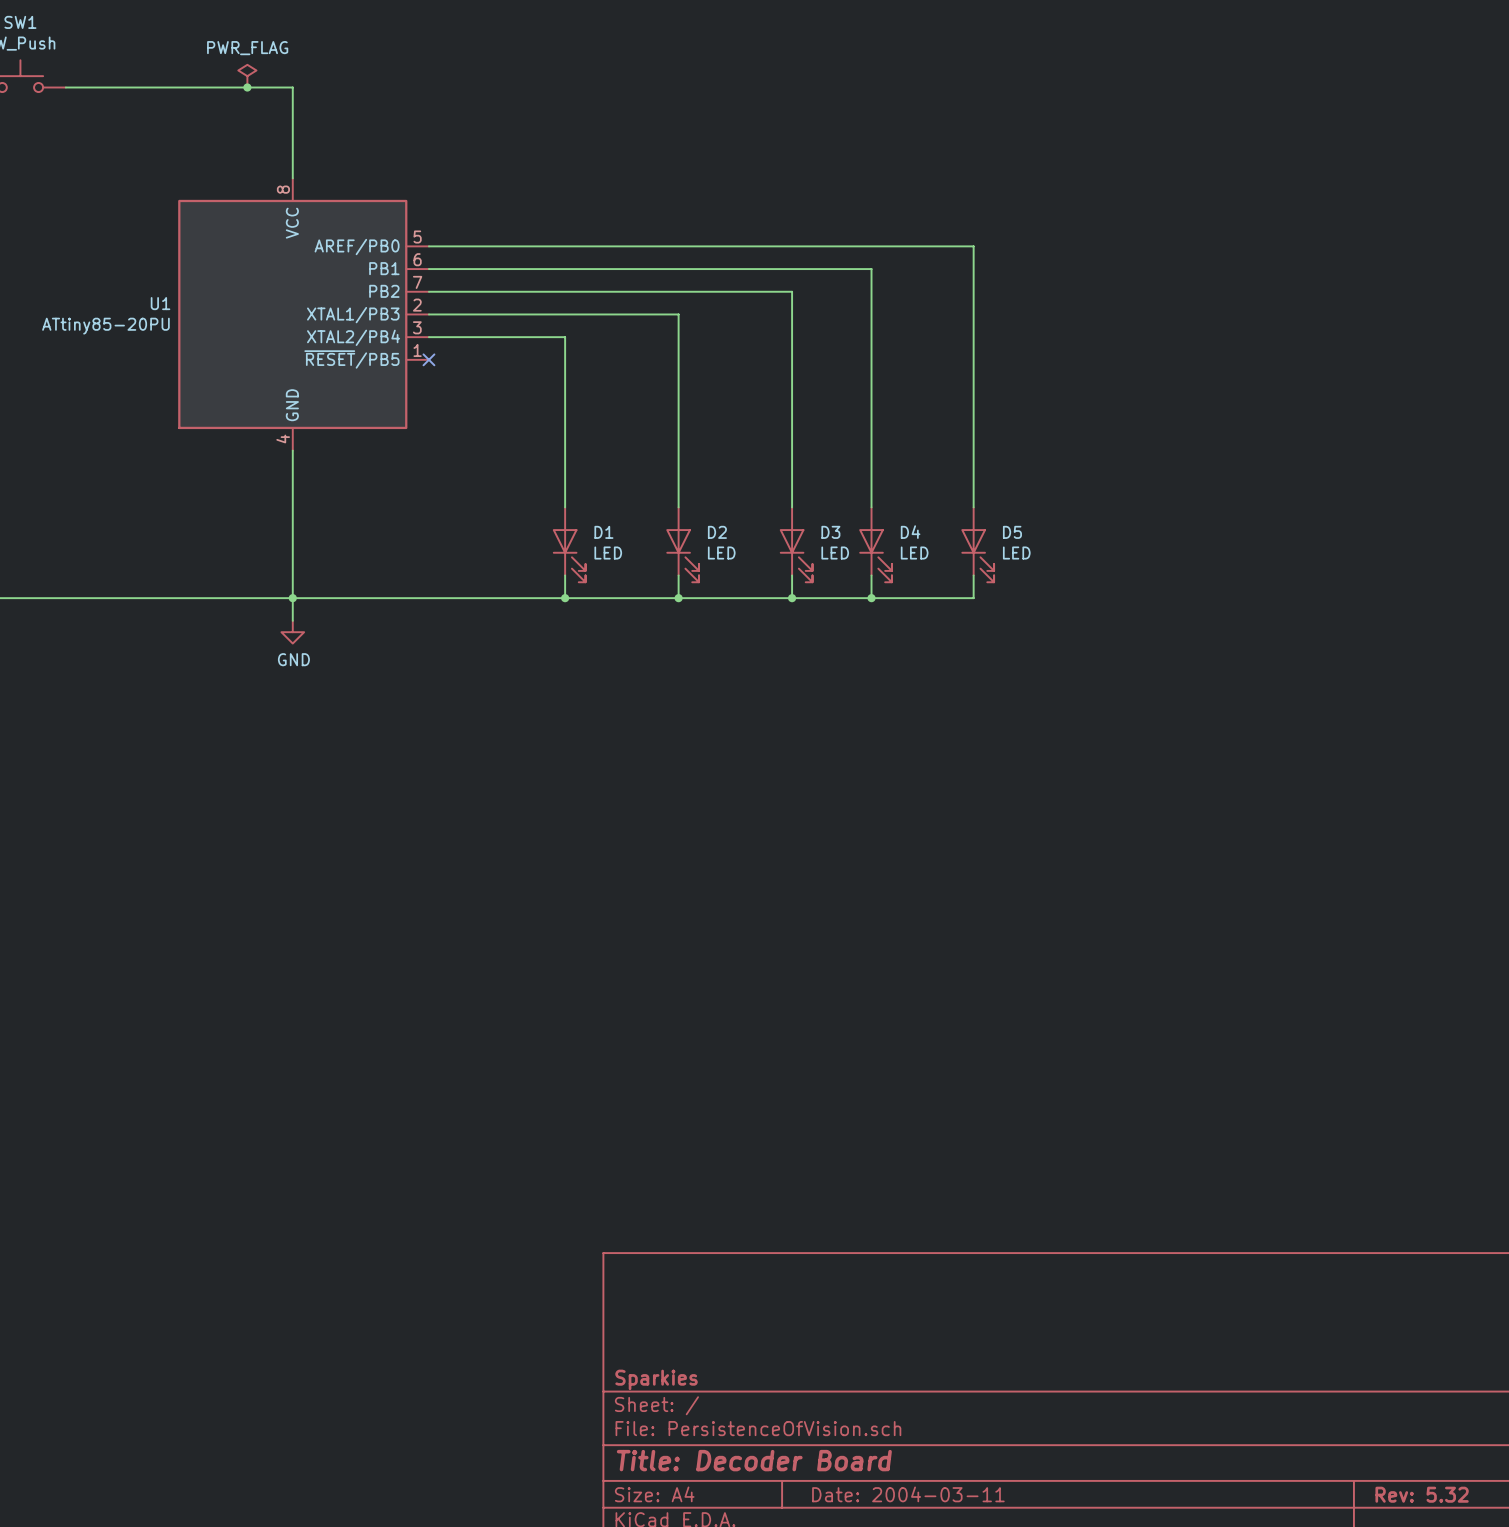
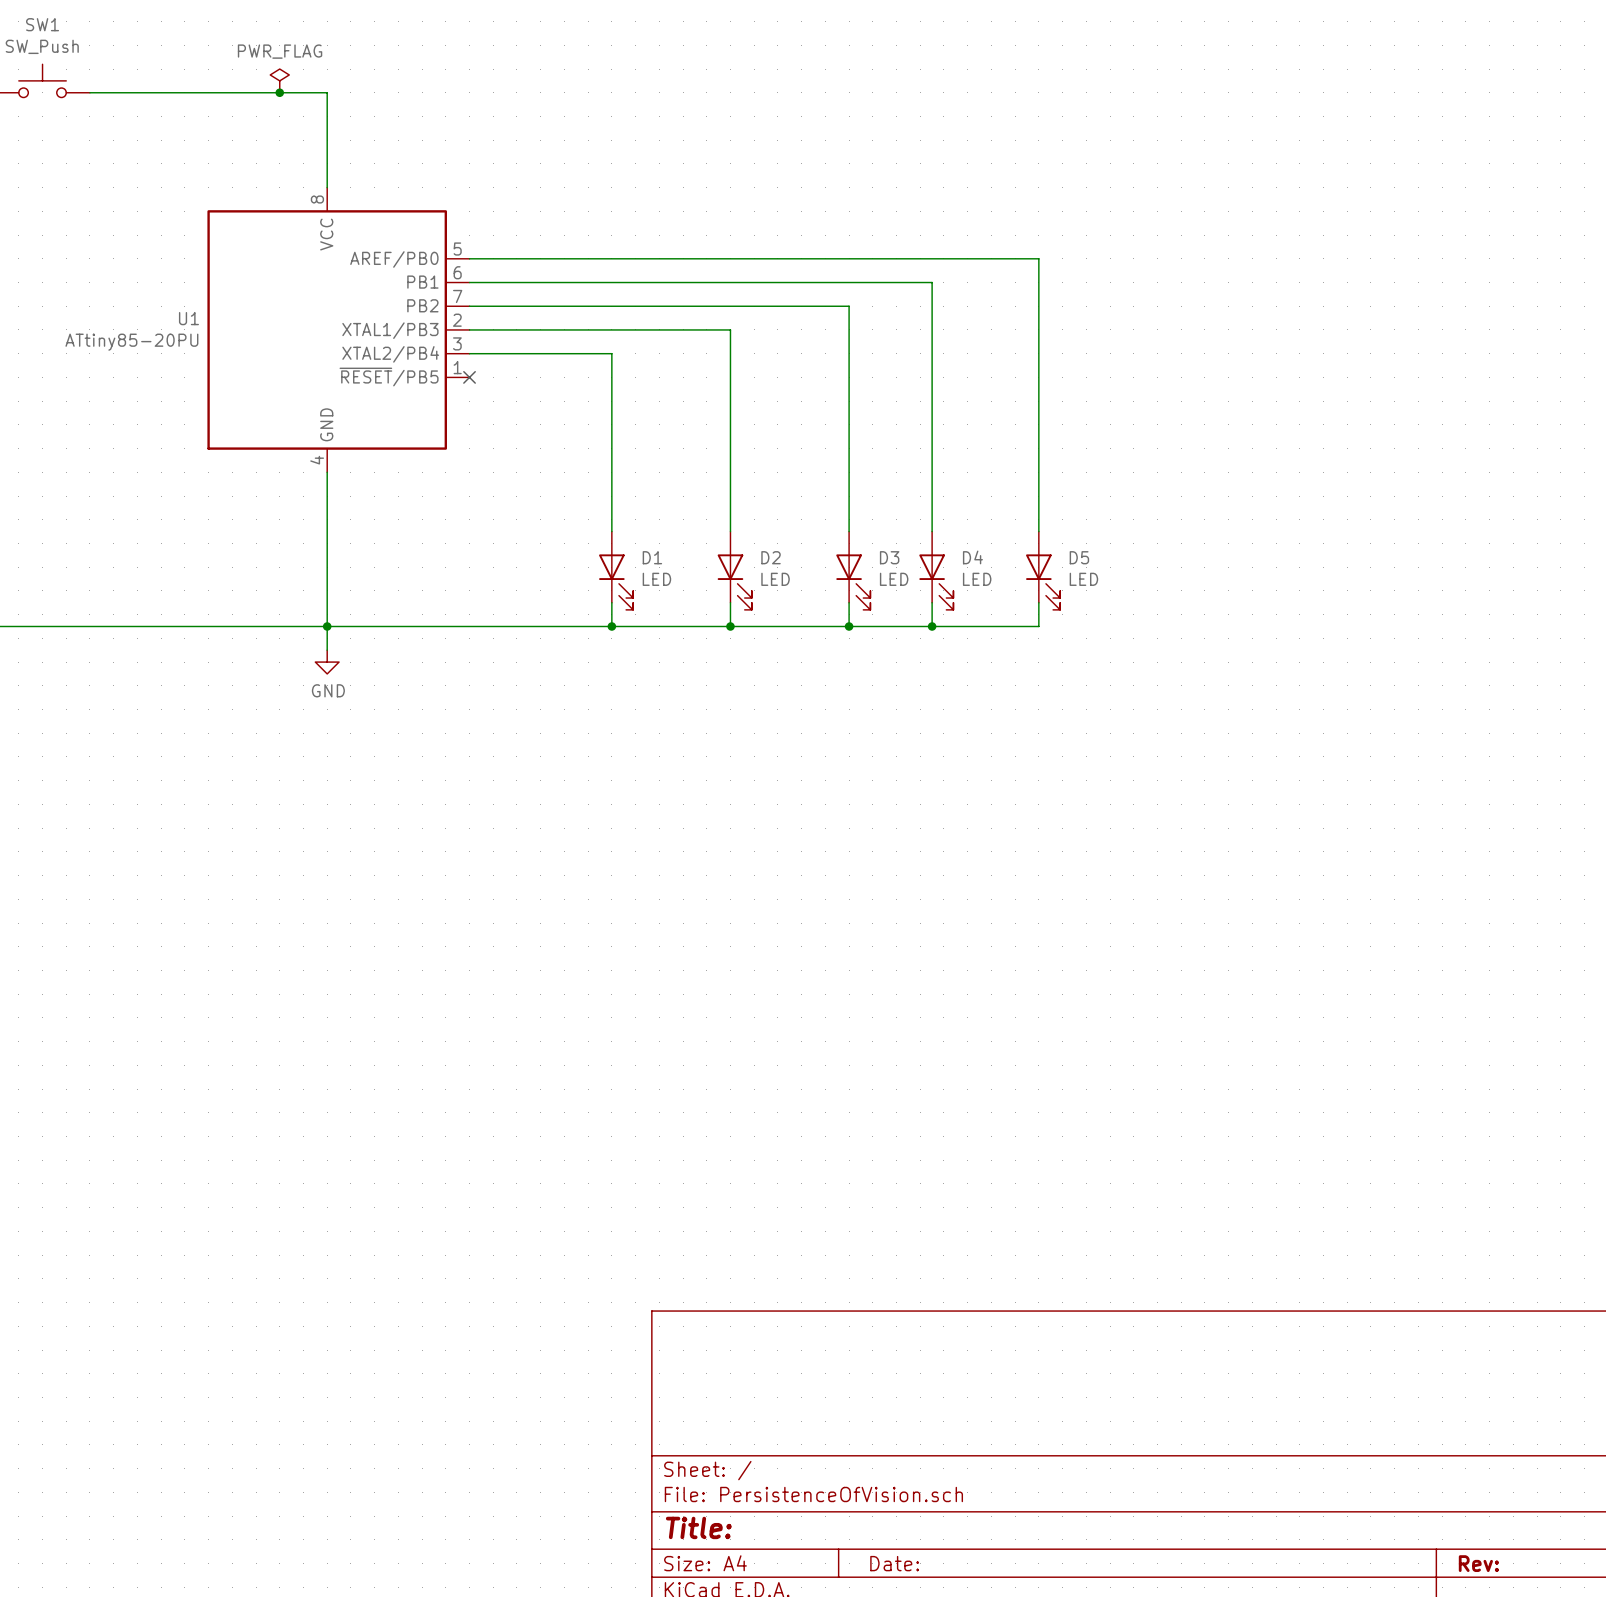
title block: Sparkies (656, 1379) -> none
title block: Title: Decoder Board (754, 1460) -> Title: (698, 1527)
title block: Date: 2004-03-11 (908, 1494) -> Date: (894, 1563)
title block: Rev: 5.32 (1422, 1494) -> Rev: (1478, 1563)

